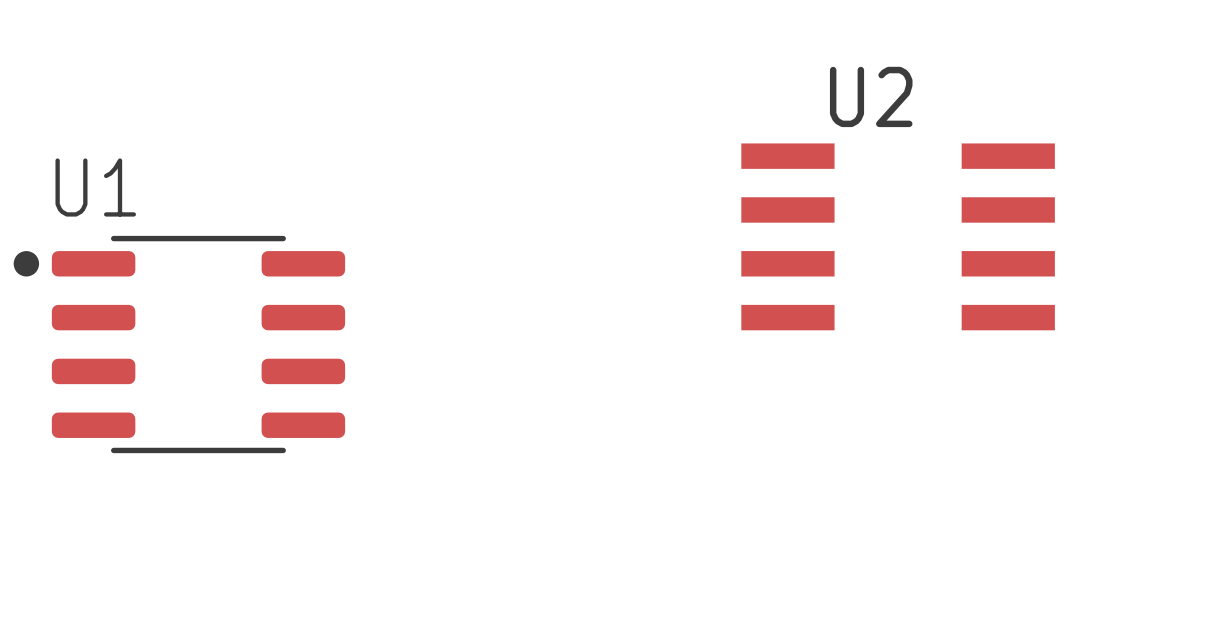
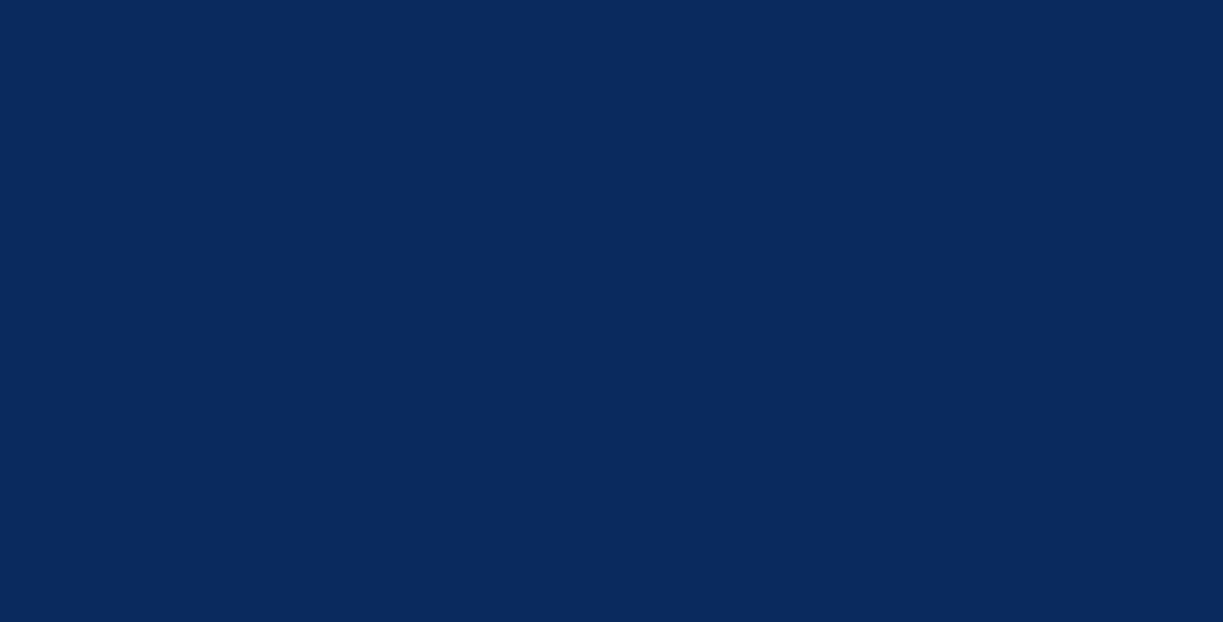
U2: (898, 236) -> none
U1: (179, 344) -> none

